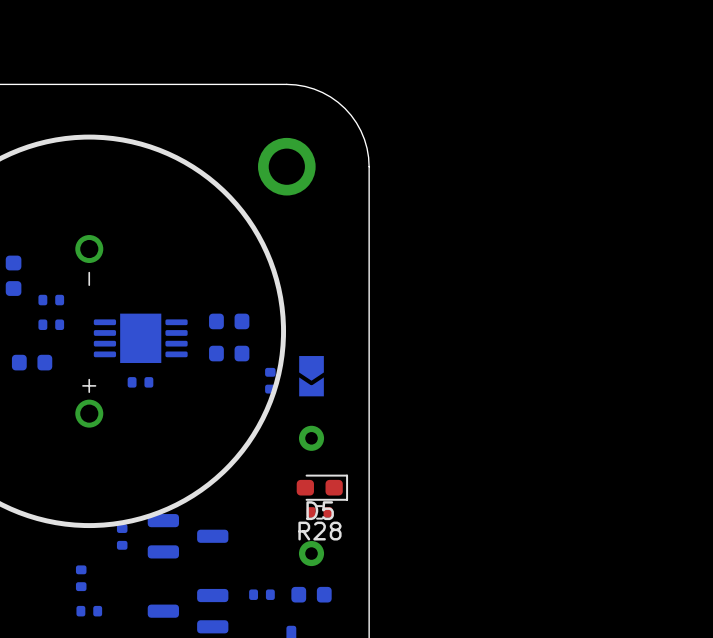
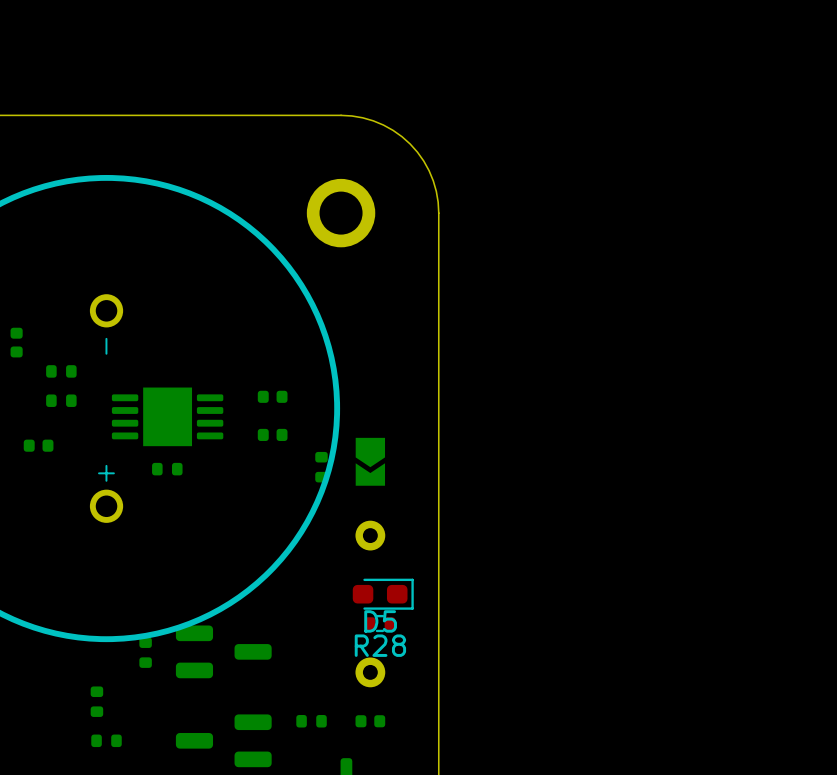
part footprint: [5, 255, 22, 296] -> [10, 327, 23, 358]
part footprint: [209, 313, 250, 330] -> [257, 390, 288, 403]
part footprint: [209, 345, 250, 362] -> [257, 428, 288, 441]
part footprint: [11, 354, 53, 371] -> [23, 439, 54, 452]
part footprint: [291, 586, 332, 603] -> [355, 715, 386, 728]

